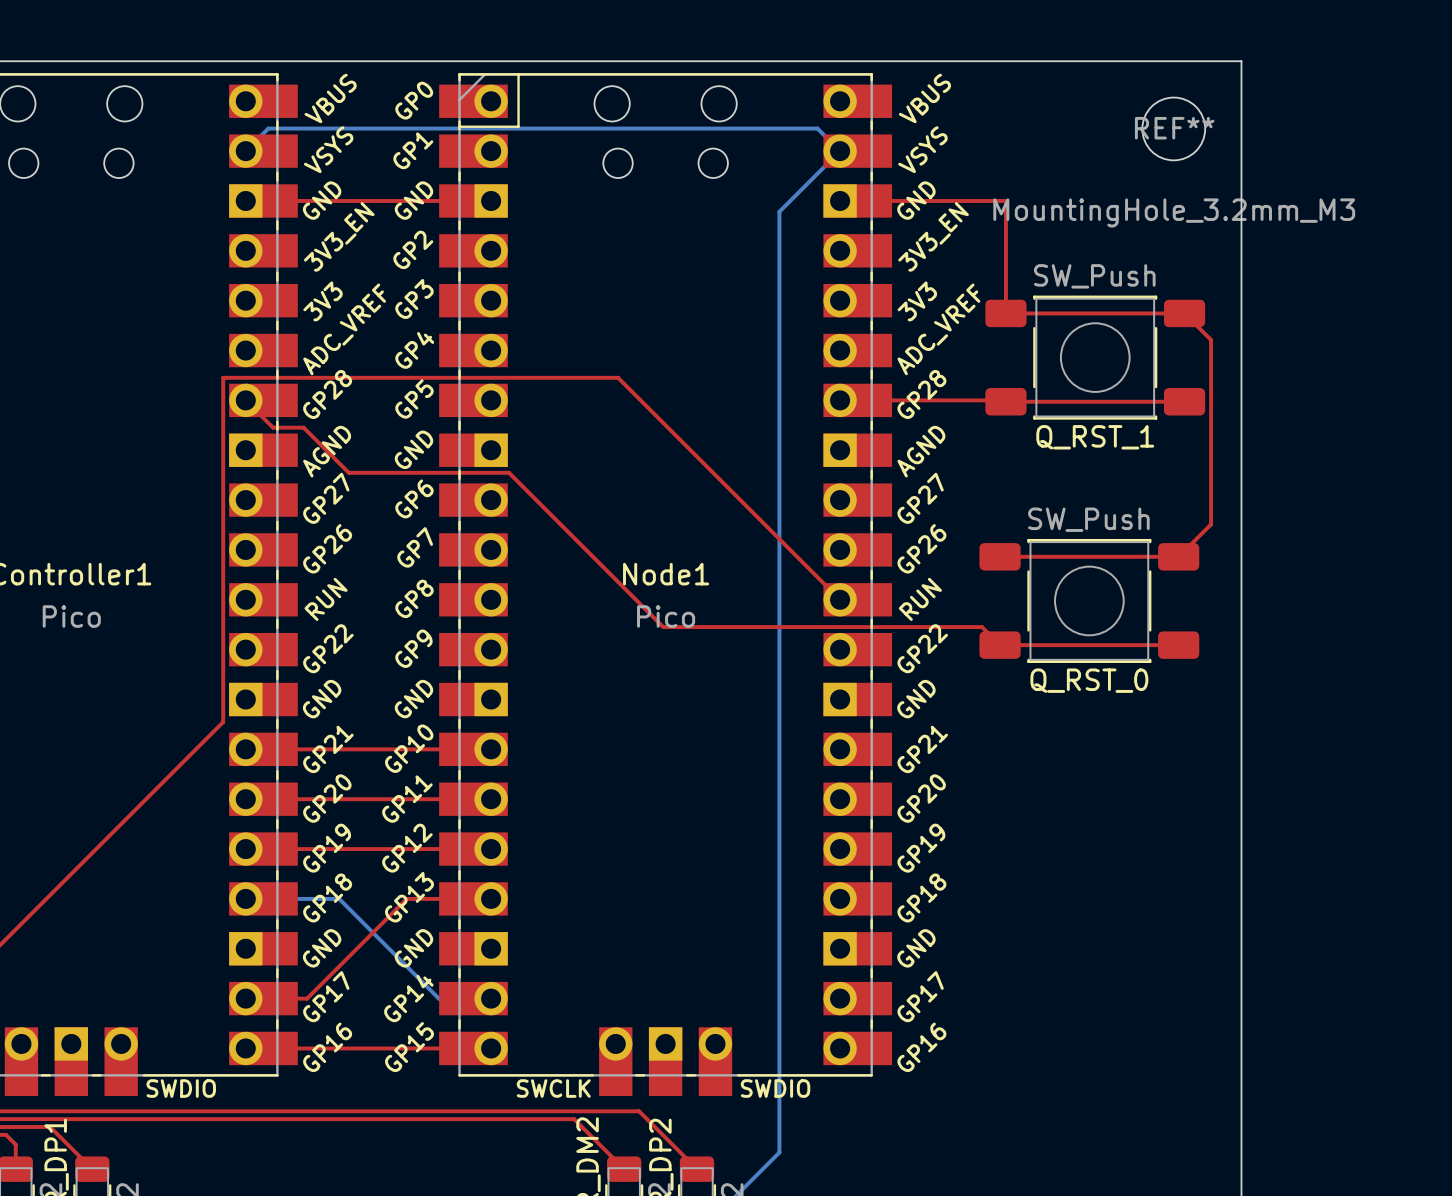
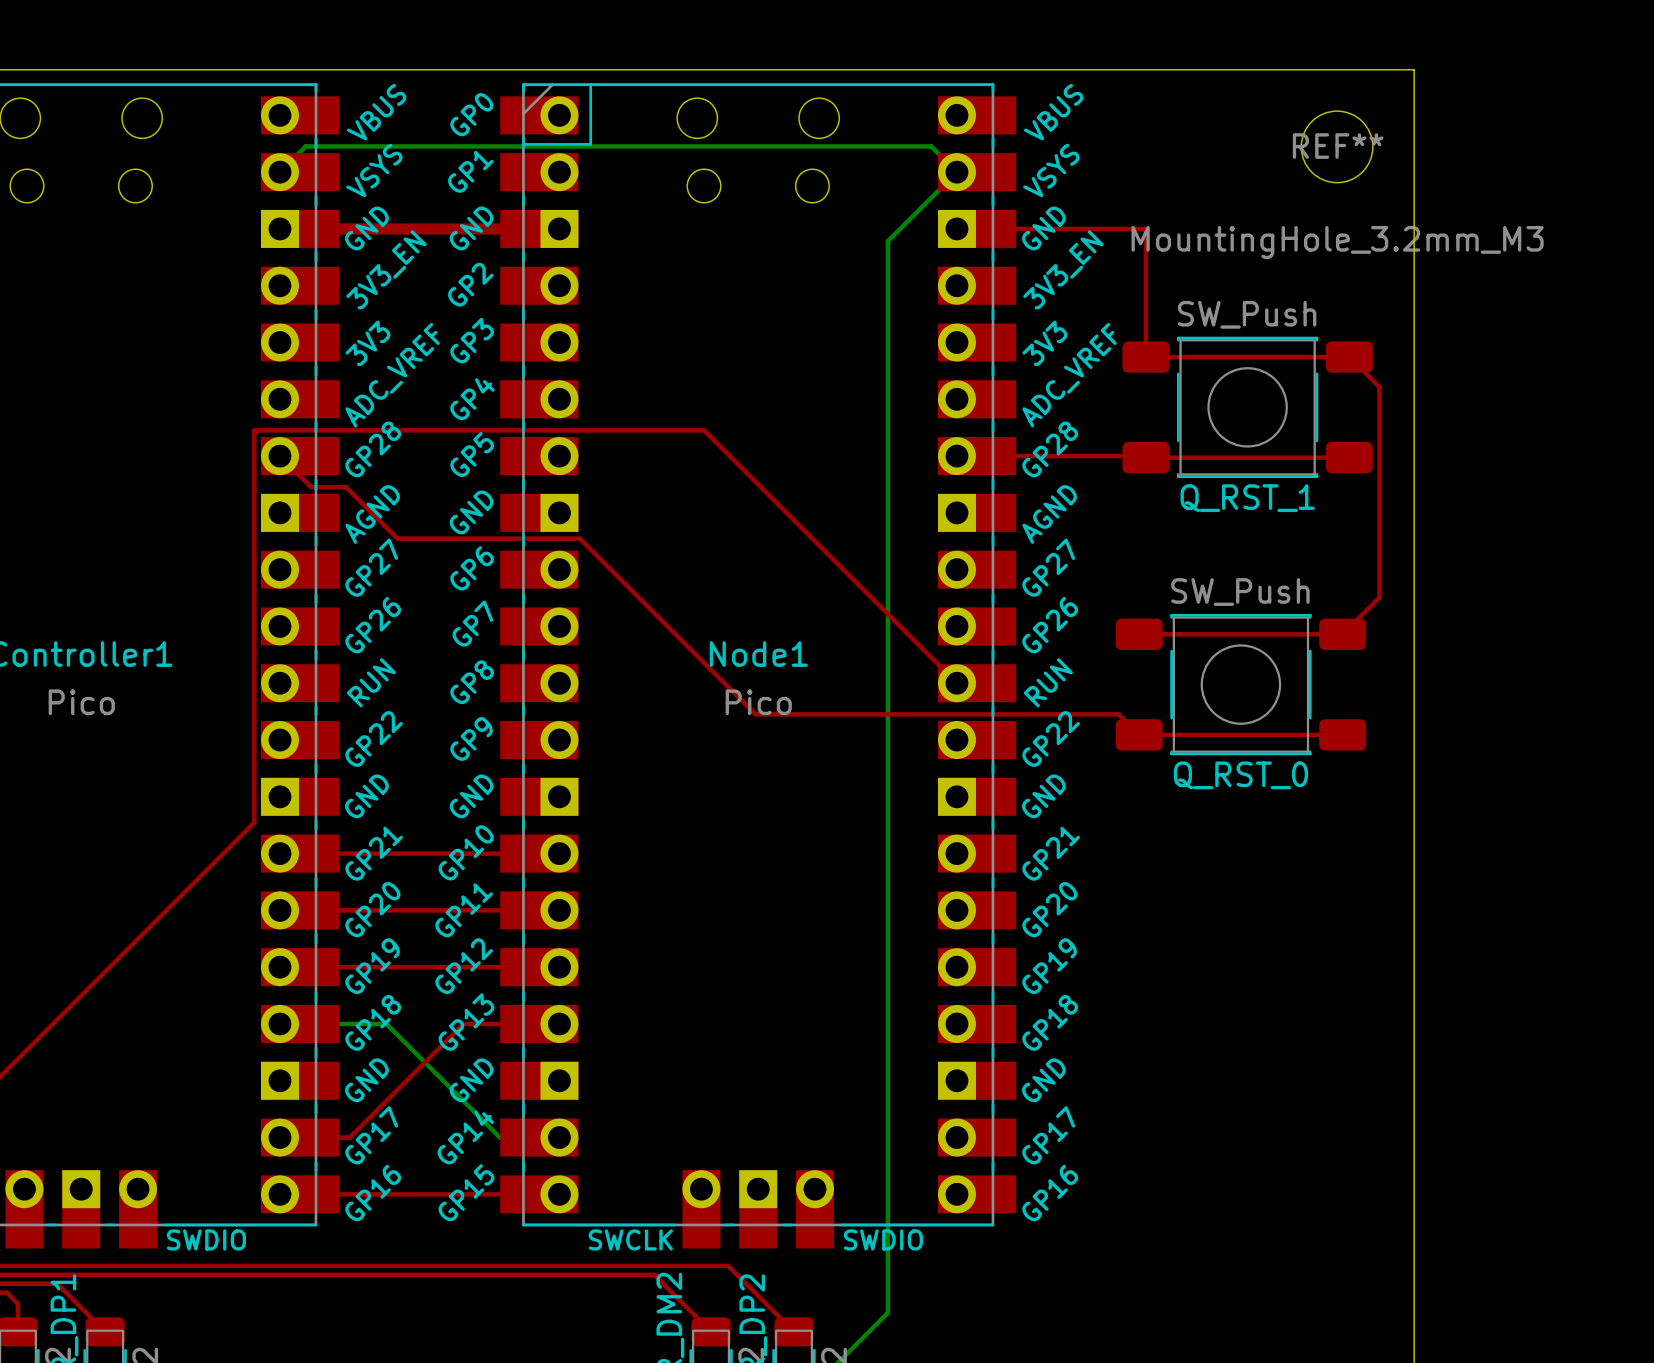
top track width: thin (245, 200) (491, 200) -> thick (279, 228) (559, 228)

